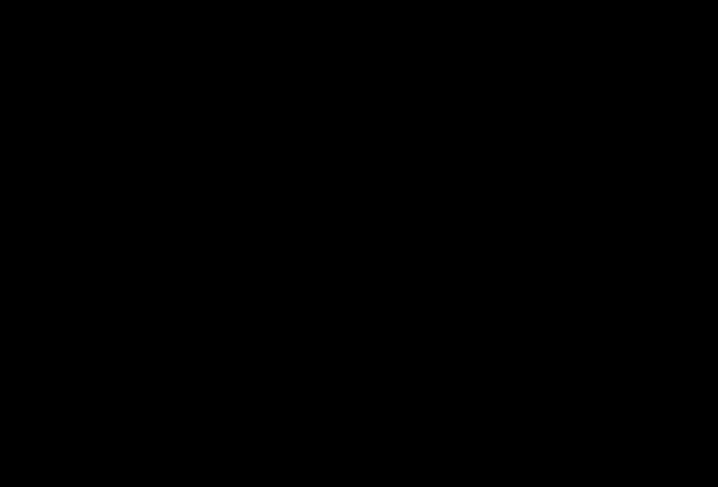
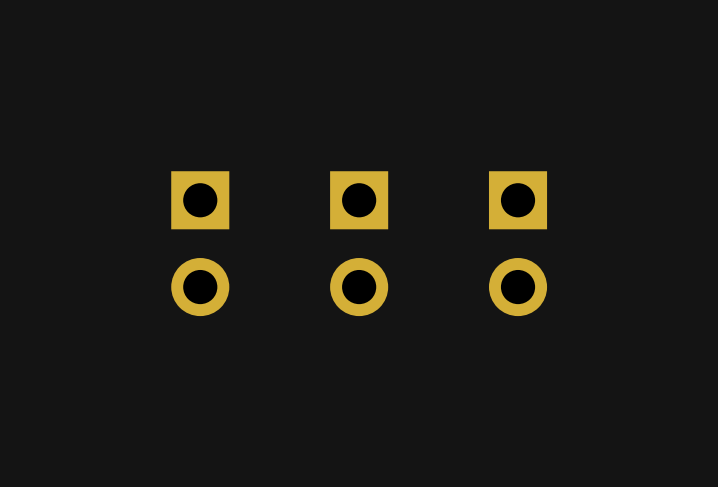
part: none -> (200, 243)
part: none -> (359, 243)
part: none -> (518, 243)

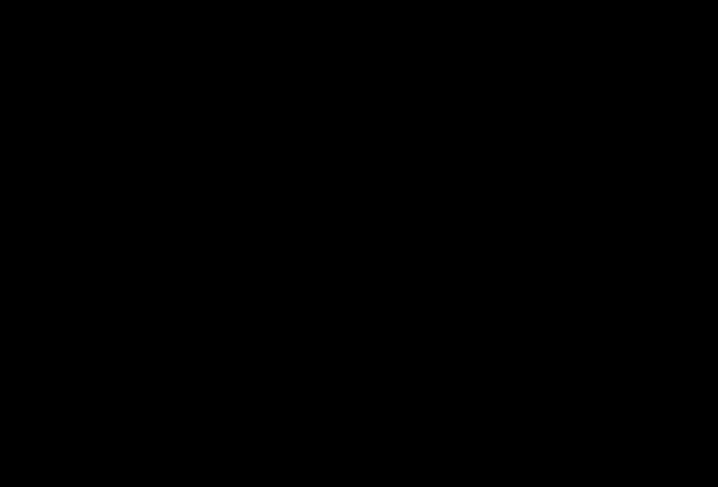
part: (200, 243) -> none
part: (359, 243) -> none
part: (518, 243) -> none

